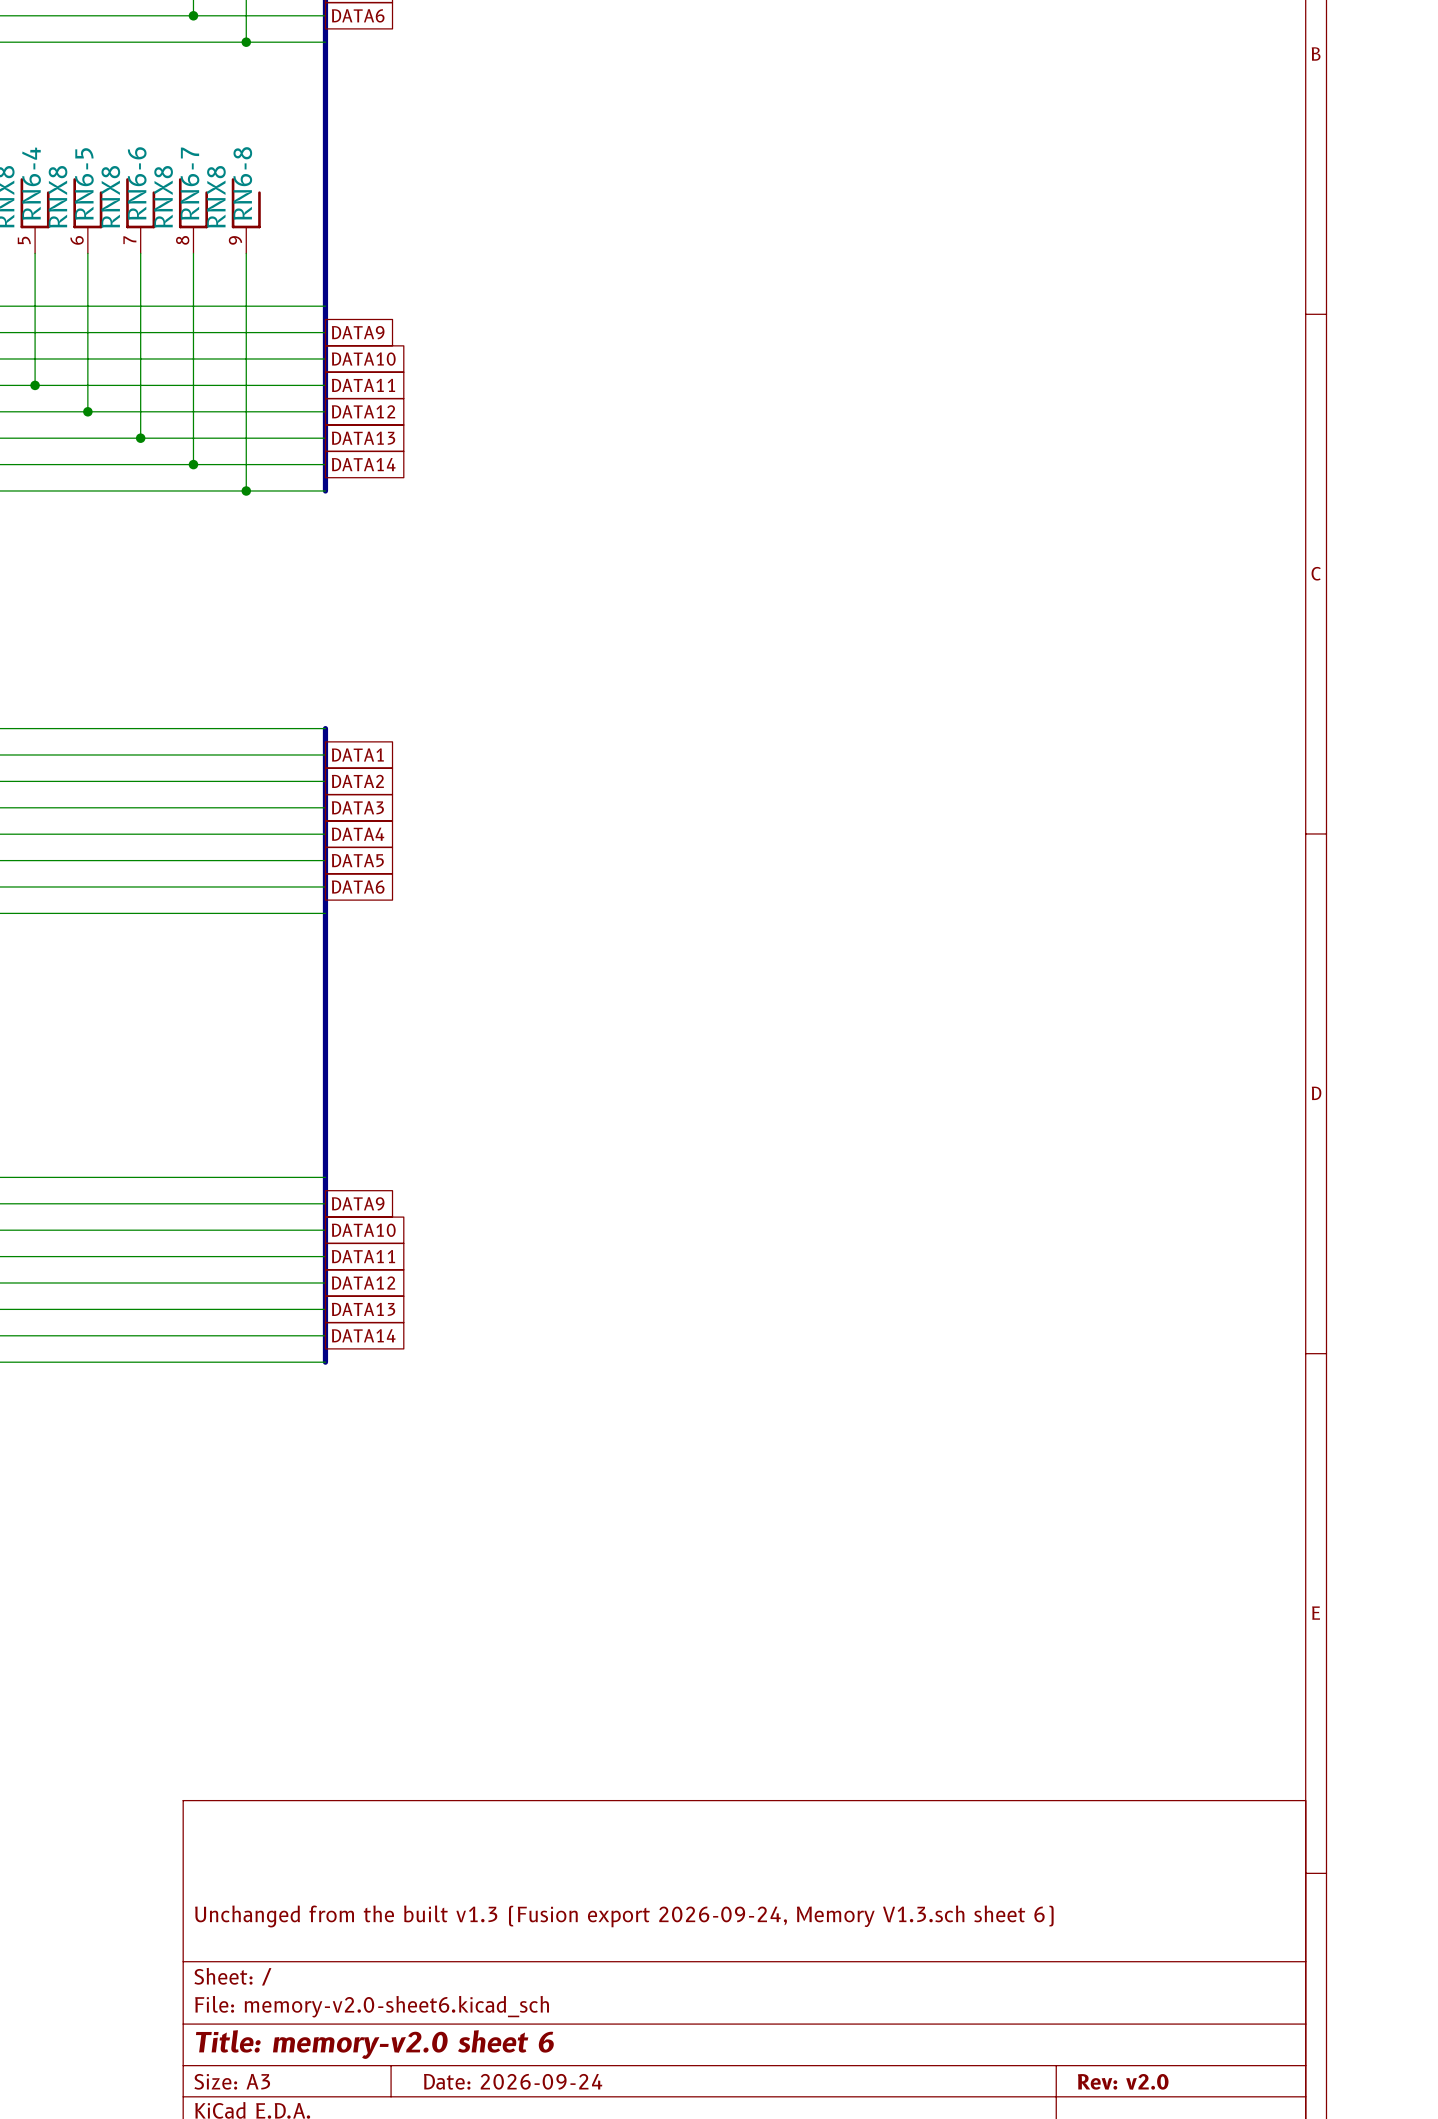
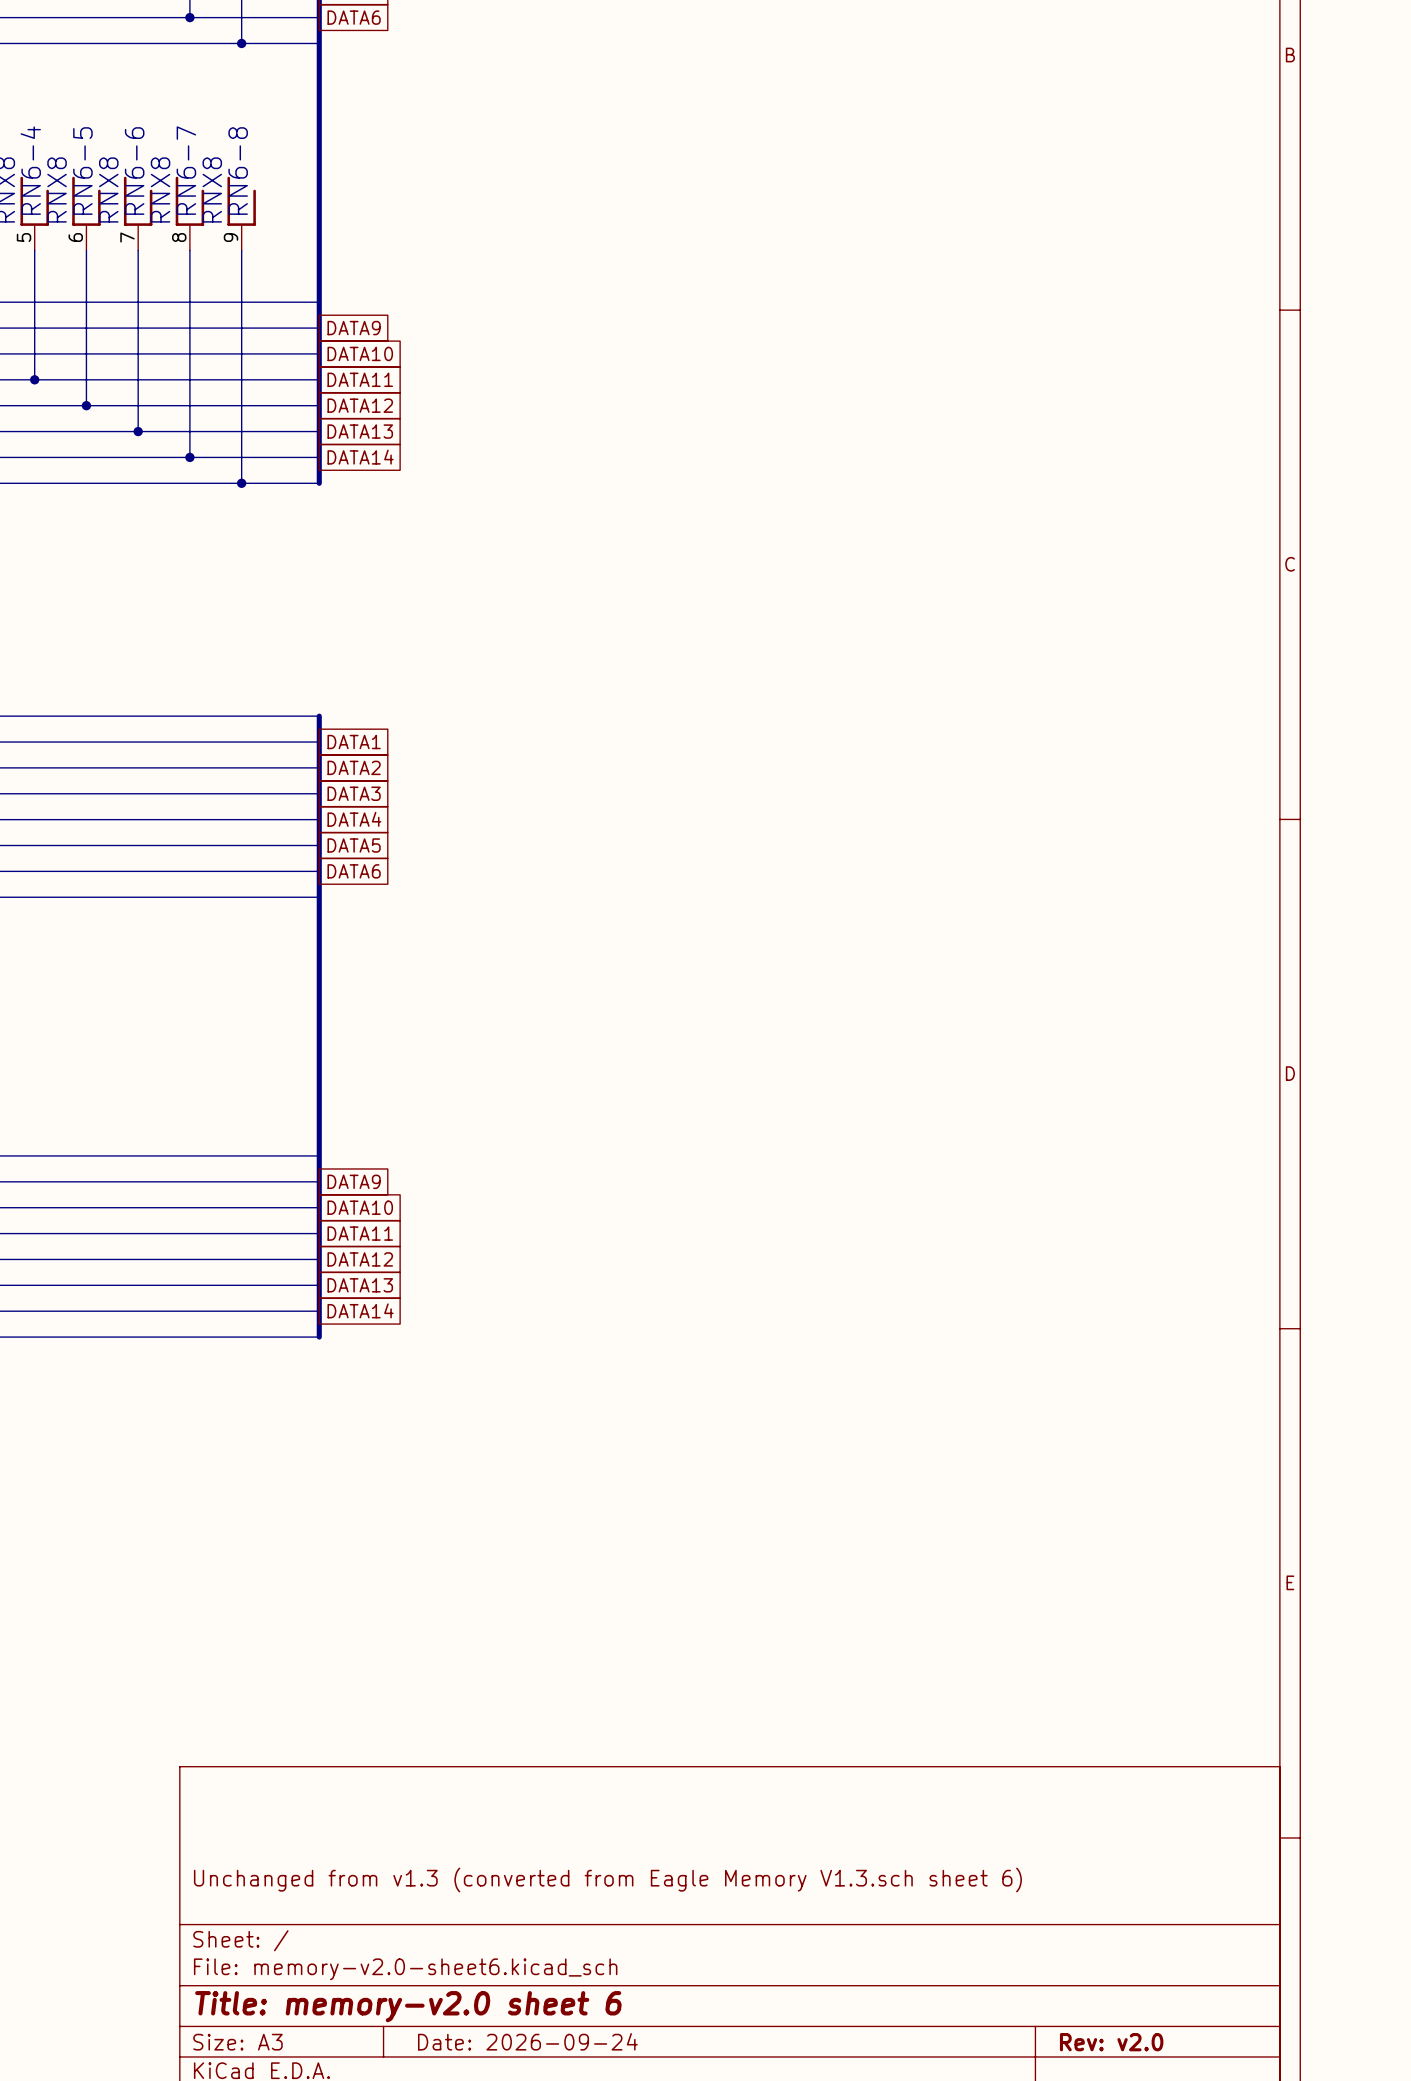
title block: Unchanged from the built v1.3 (Fusion export 2026-09-24, Memory V1.3.sch sheet 6) (624, 1916) -> Unchanged from v1.3 (converted from Eagle Memory V1.3.sch sheet 6) (607, 1879)

